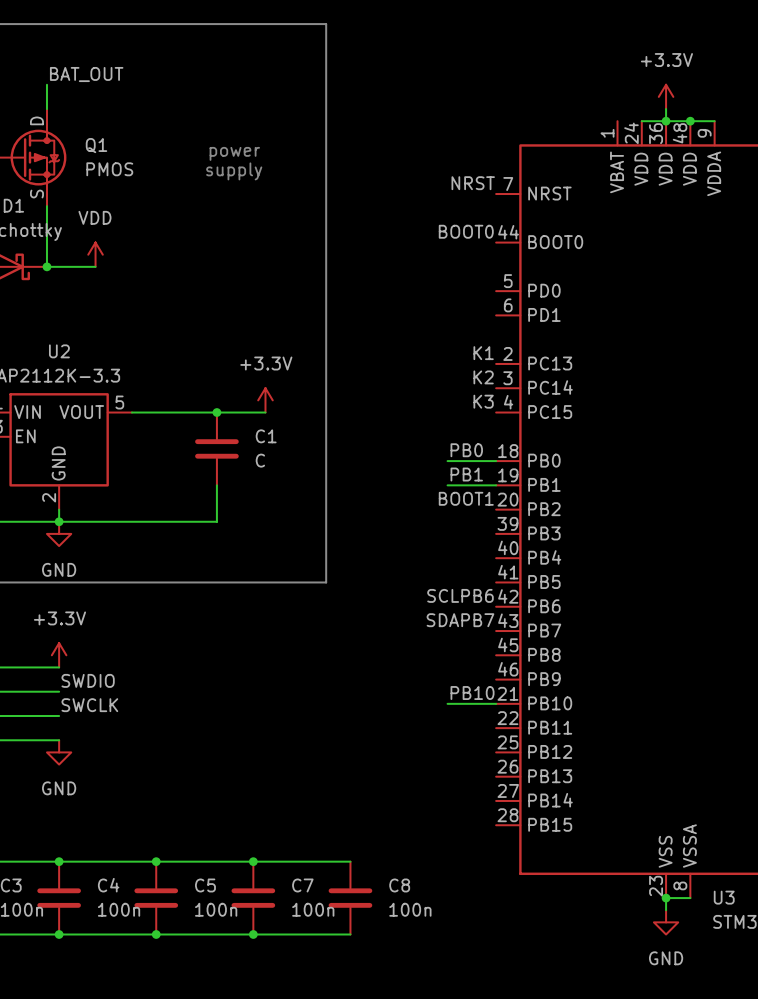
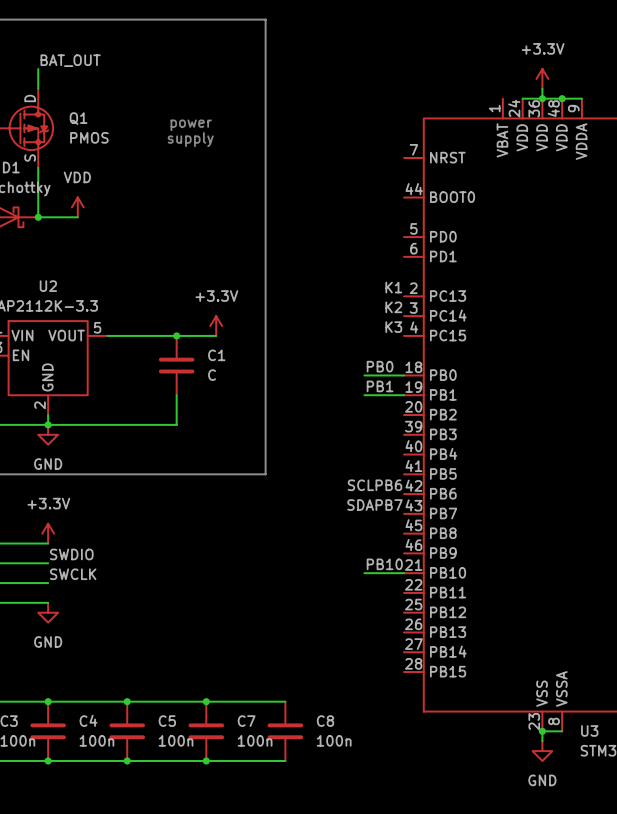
label: NRST (473, 183) -> none
label: BOOT0 (466, 231) -> none
label: BOOT1 (466, 498) -> none

